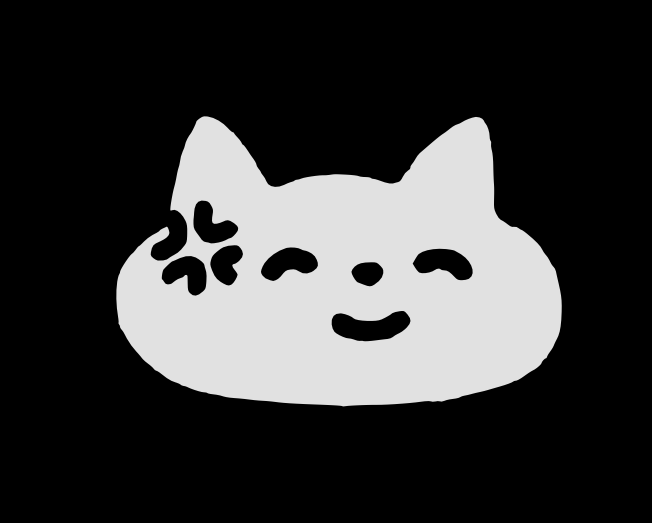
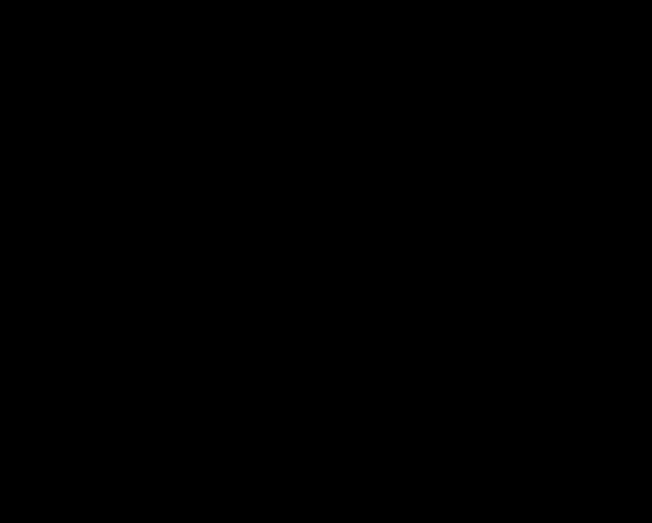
drawing: [116, 116, 562, 407] -> none

